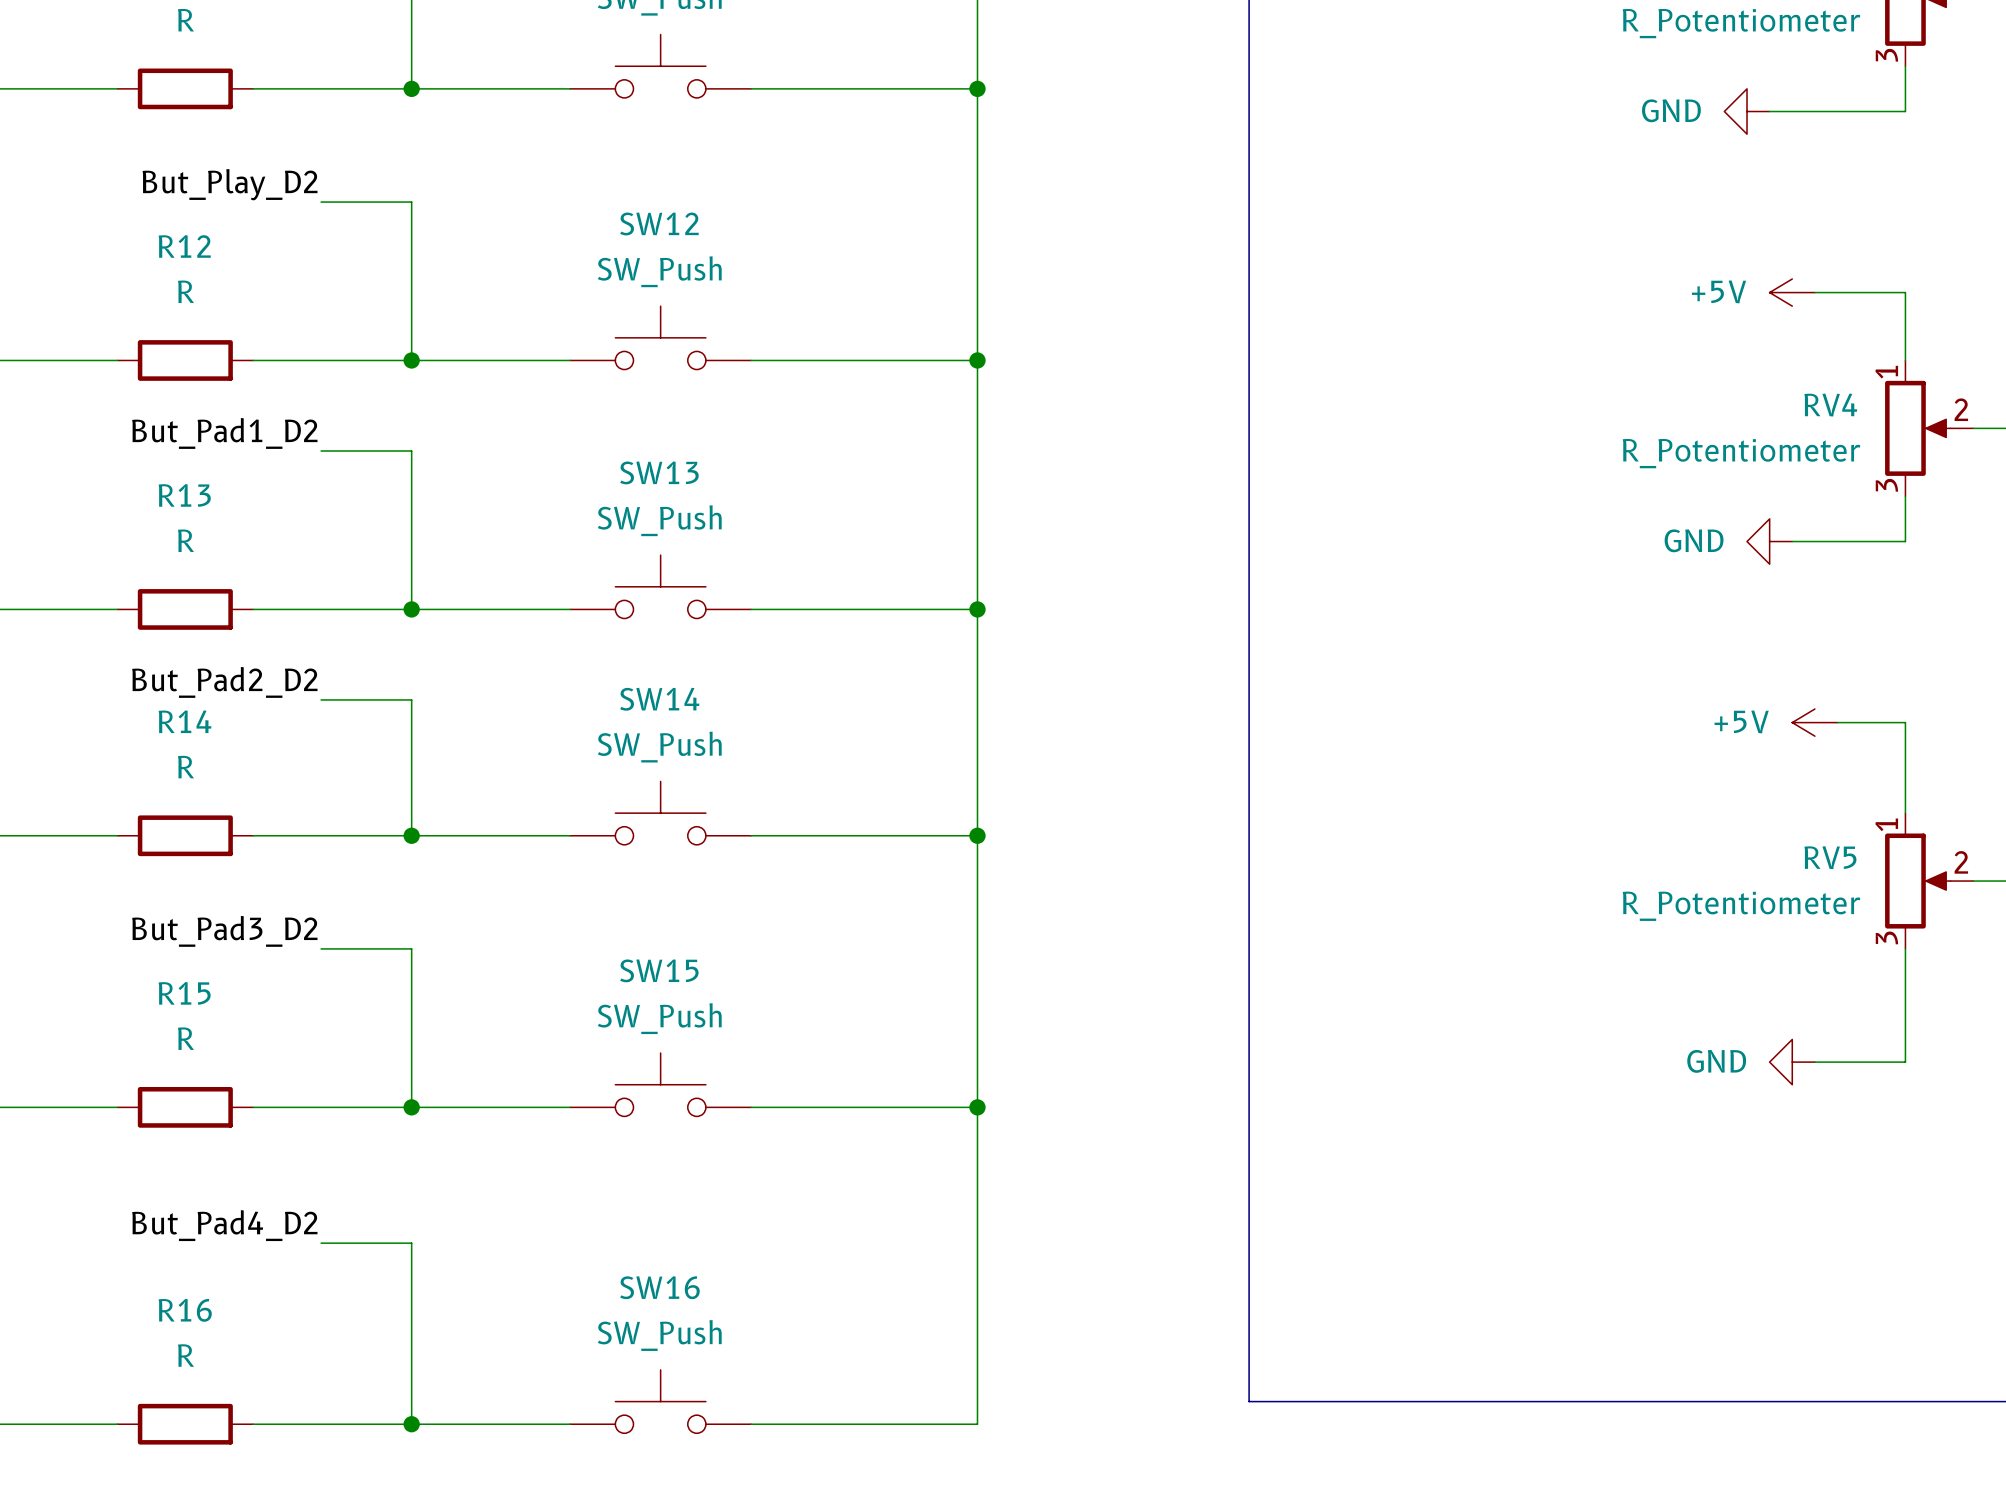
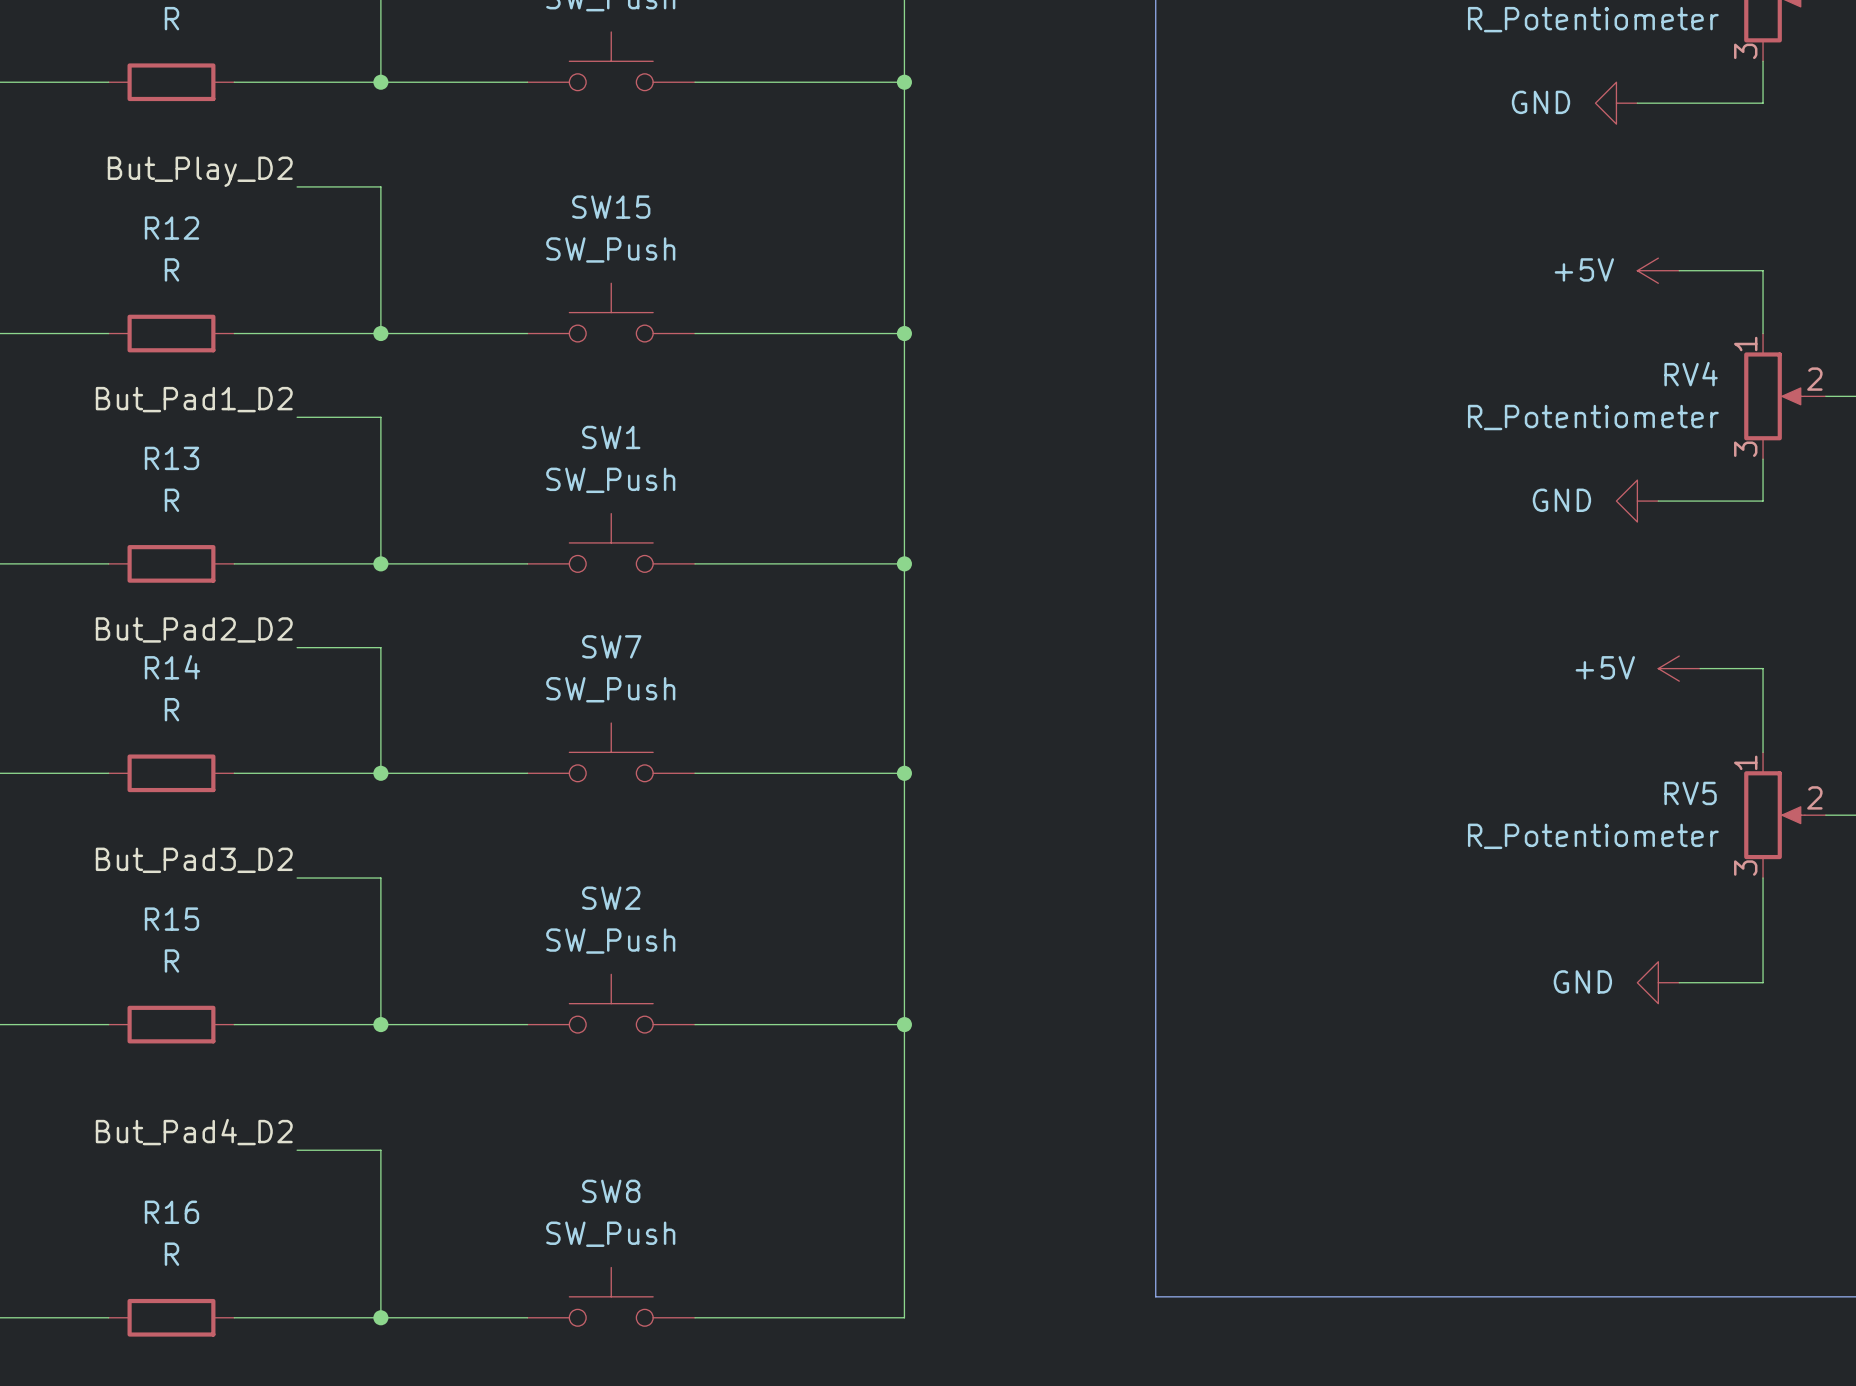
SW12 name: SW12 (659, 223) -> SW15 (611, 207)
SW13 name: SW13 (659, 472) -> SW1 (611, 437)
SW14 name: SW14 (659, 699) -> SW7 (611, 646)
SW15 name: SW15 (659, 970) -> SW2 (611, 898)
SW16 name: SW16 (659, 1287) -> SW8 (611, 1191)

